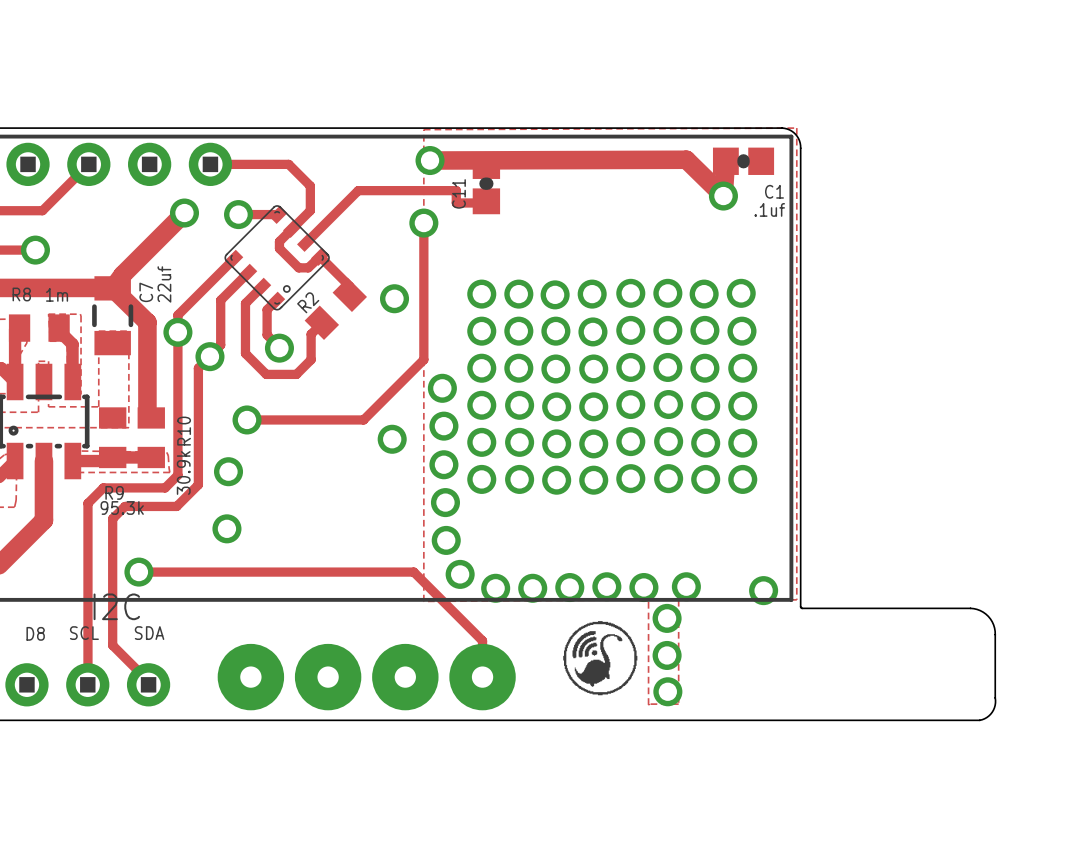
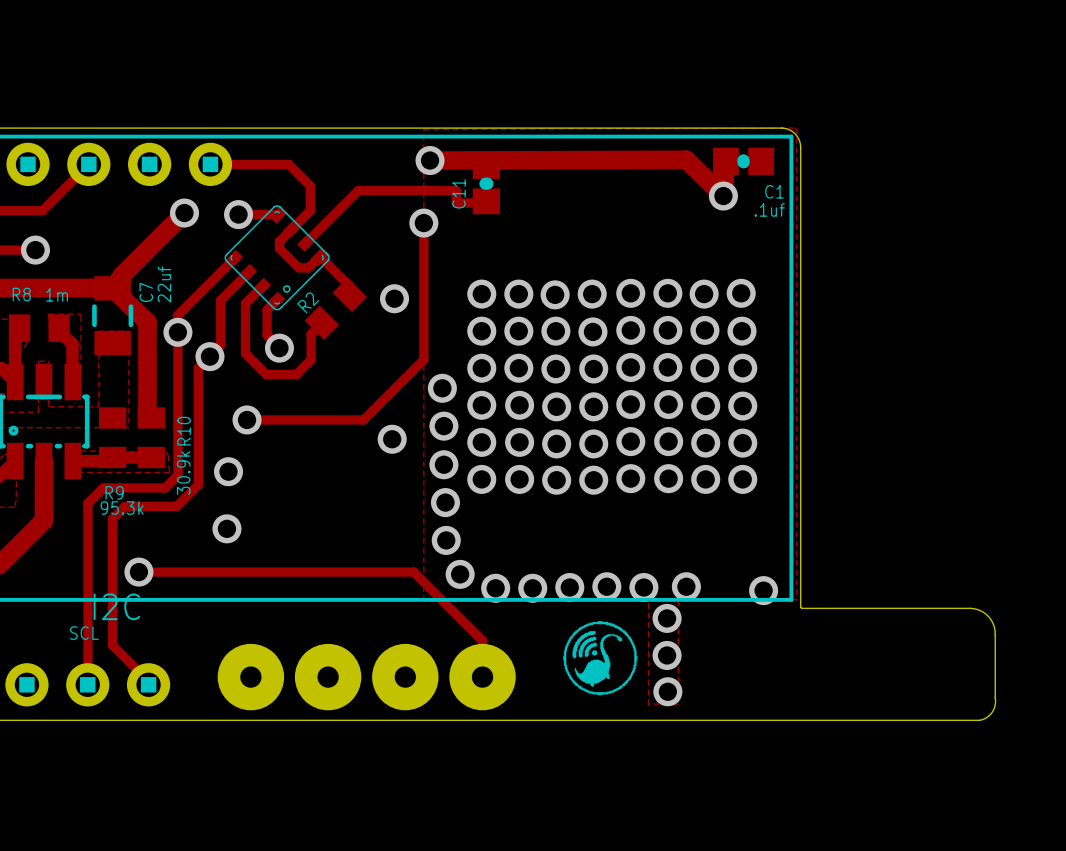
text: D8 (35, 633) -> none
text: SDA (149, 633) -> none

